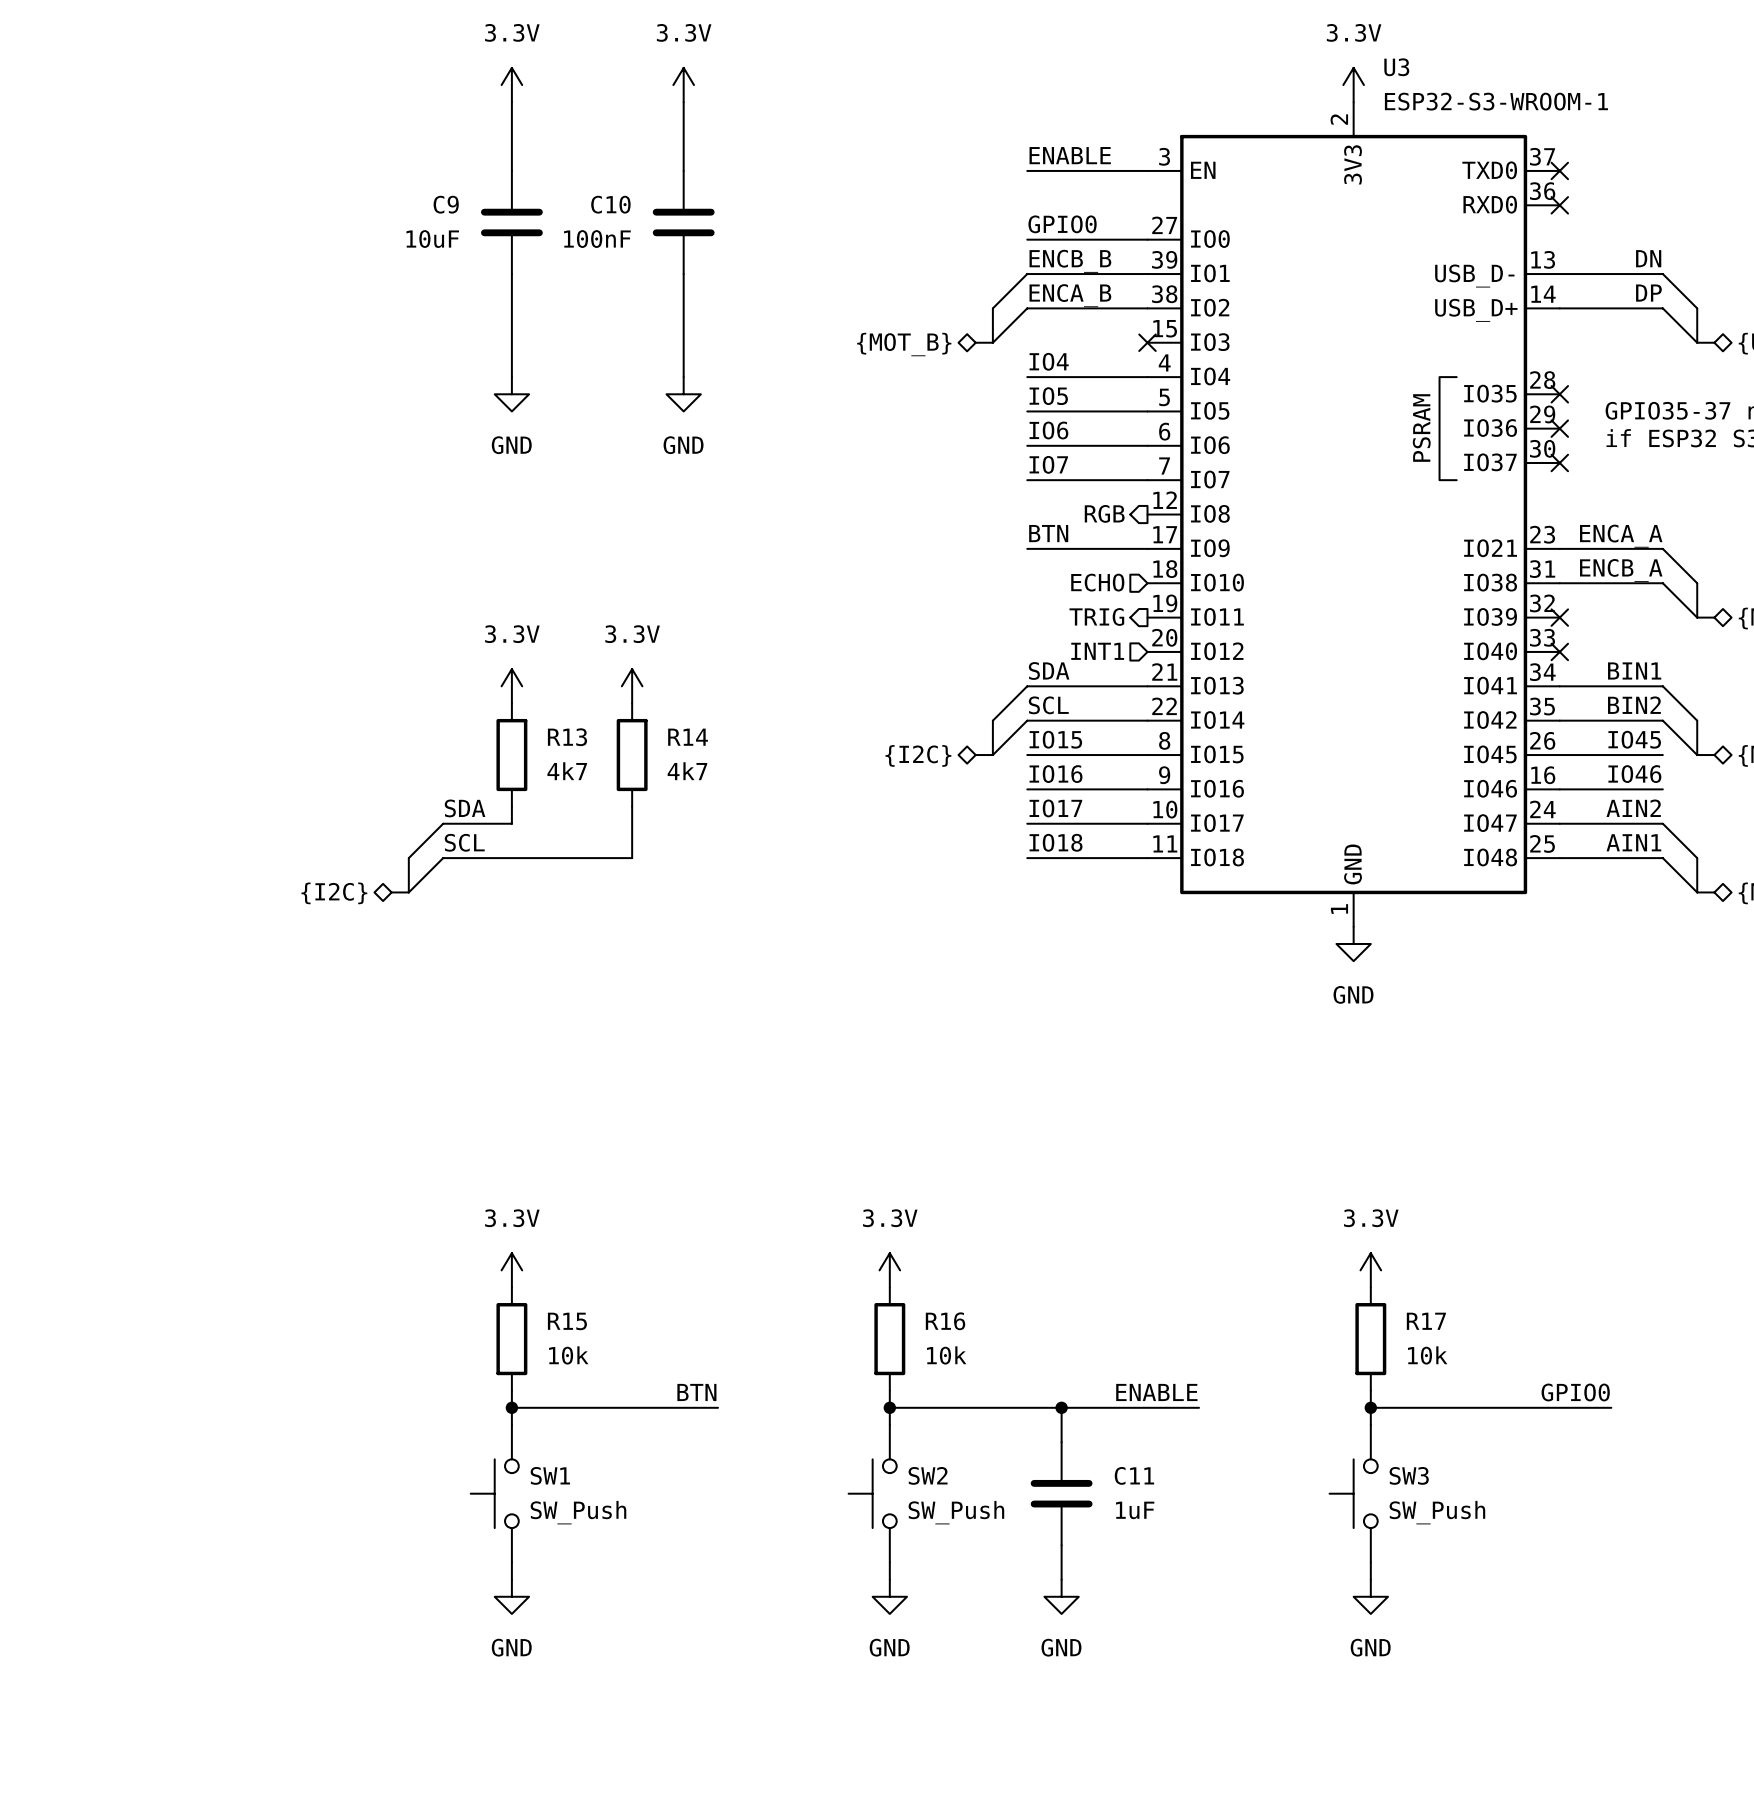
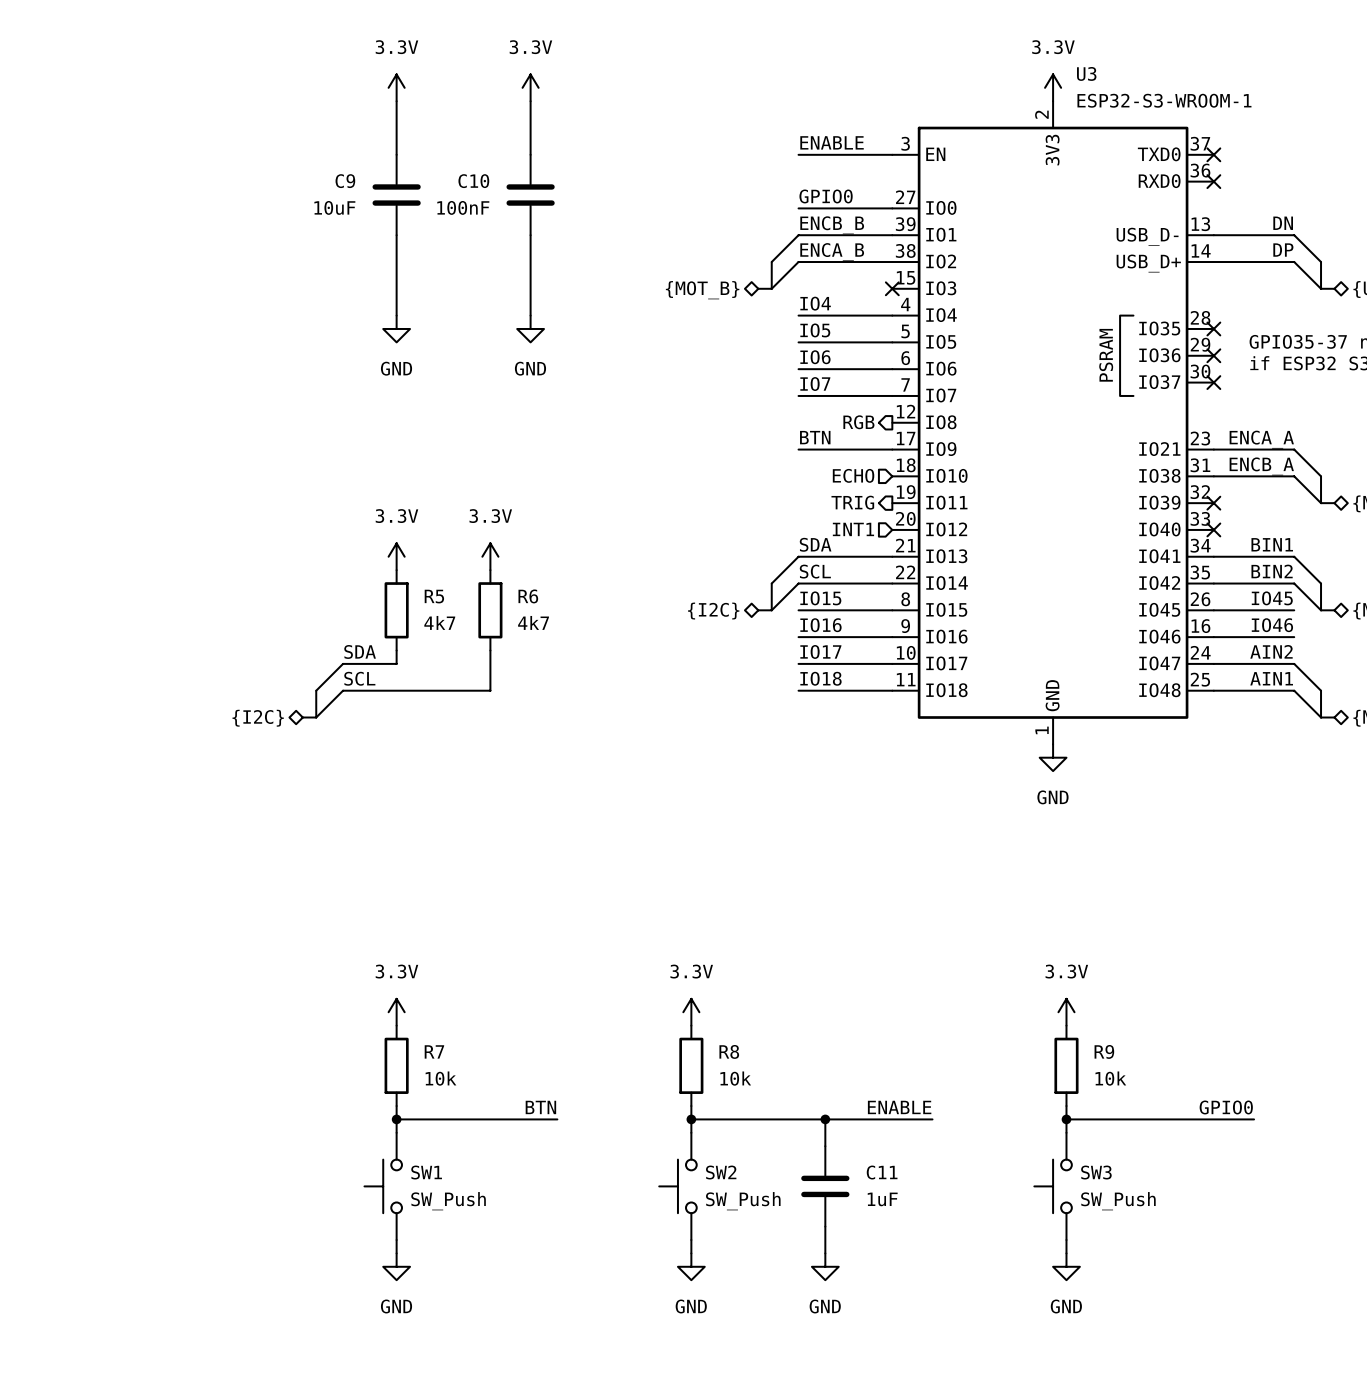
R13 name: R13 (567, 737) -> R5 (434, 596)
R14 name: R14 (688, 737) -> R6 (528, 596)
R15 name: R15 (567, 1321) -> R7 (434, 1051)
R16 name: R16 (945, 1321) -> R8 (729, 1051)
R17 name: R17 (1426, 1321) -> R9 (1104, 1051)

